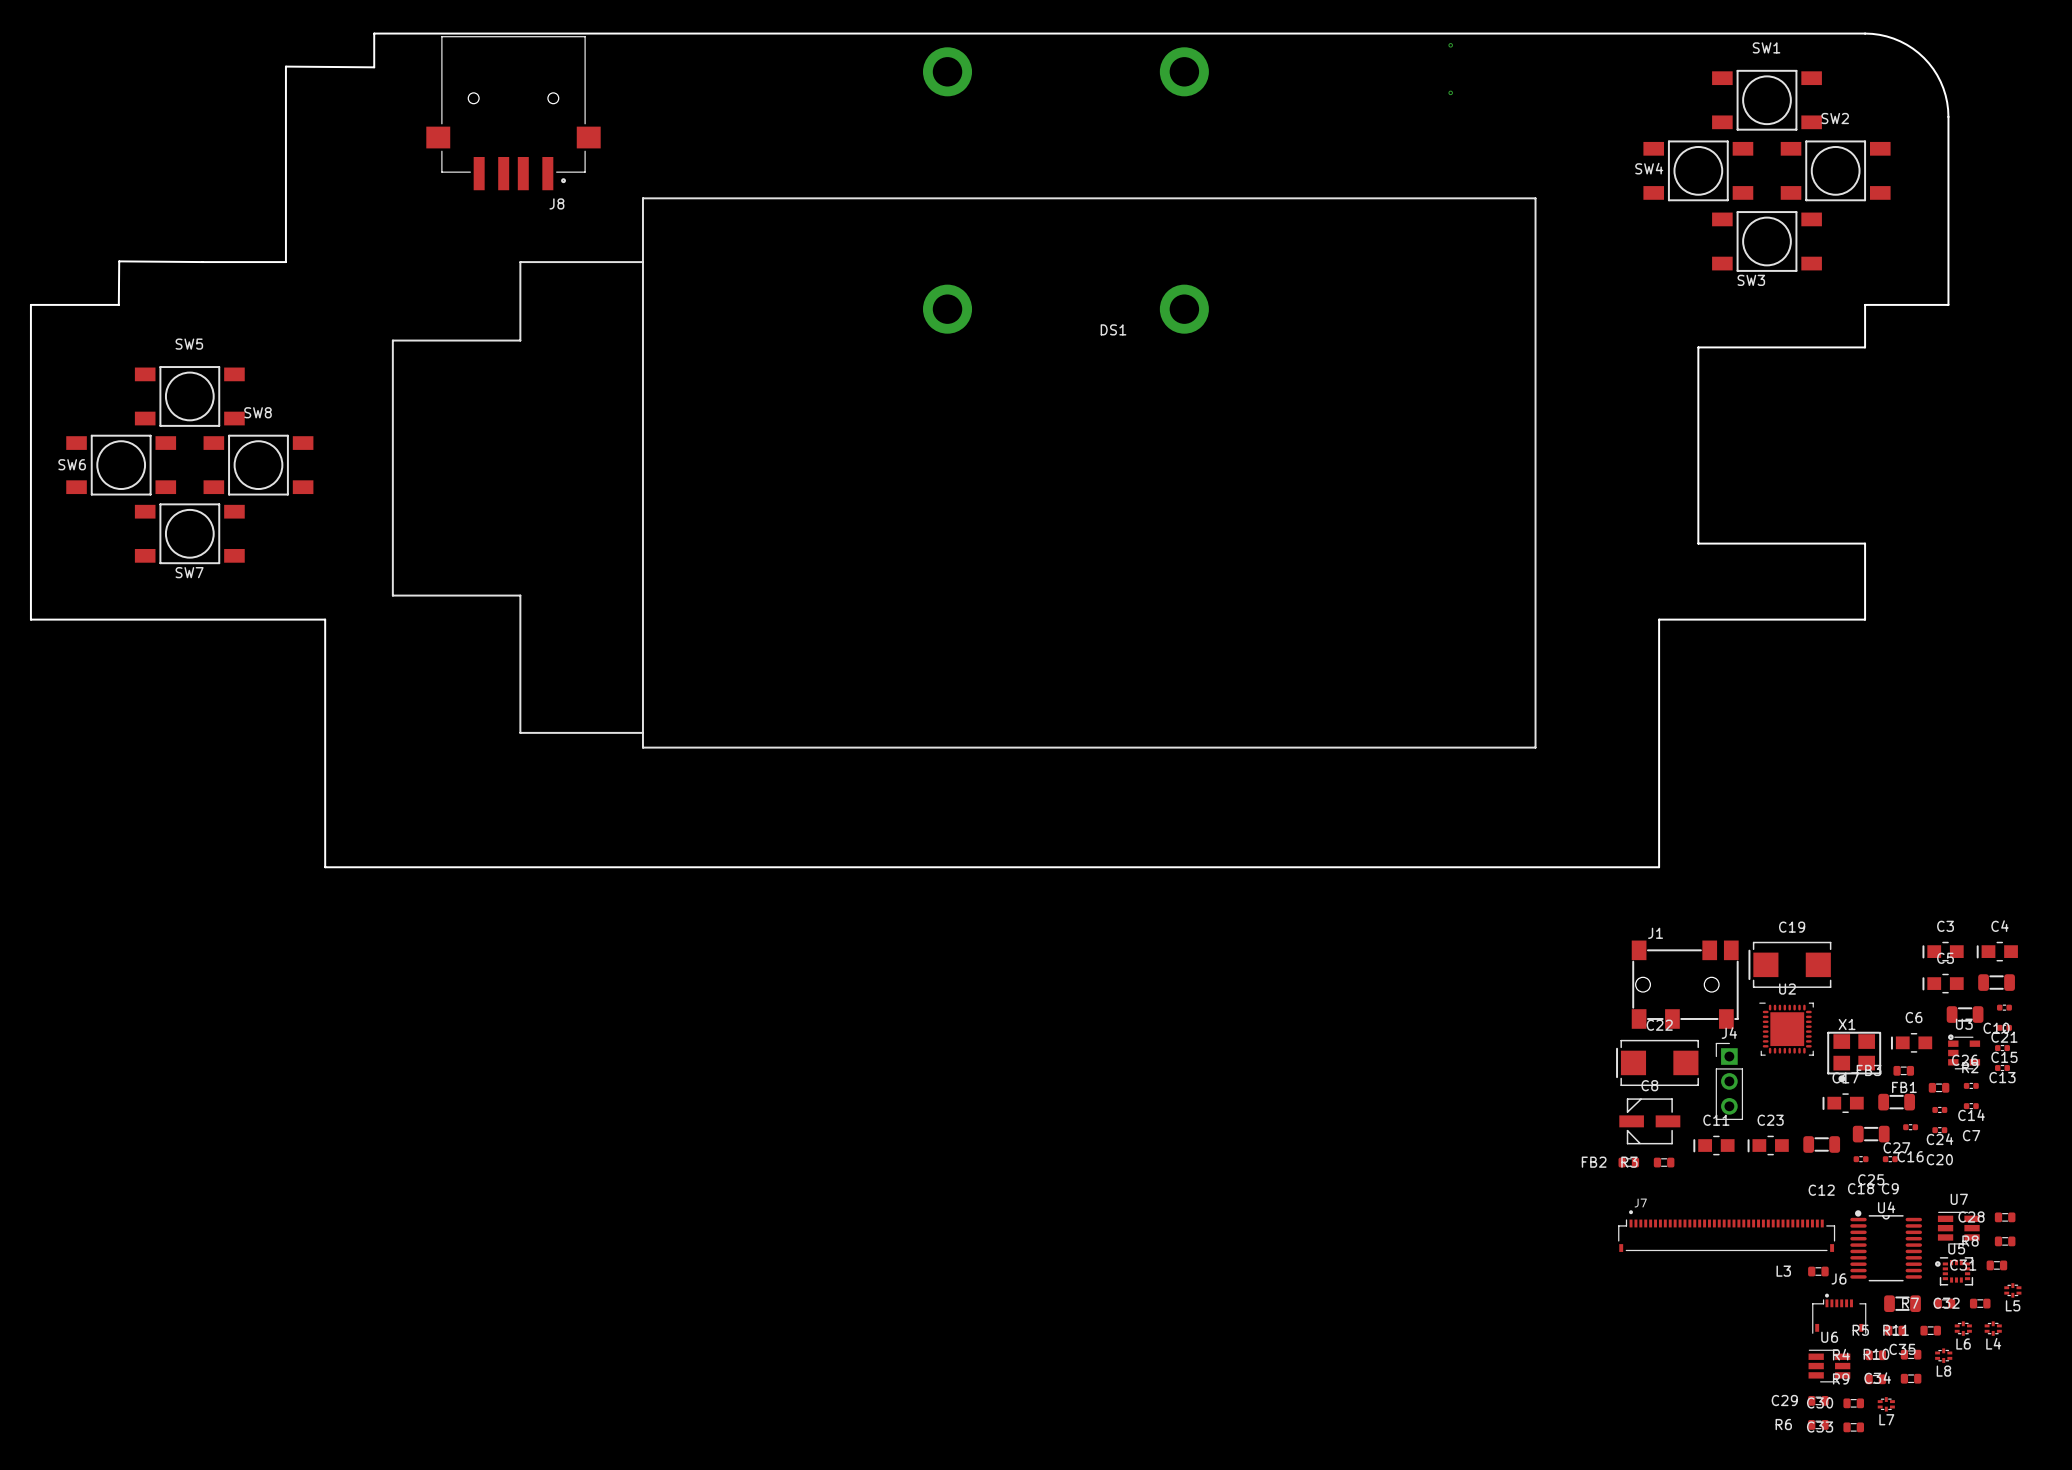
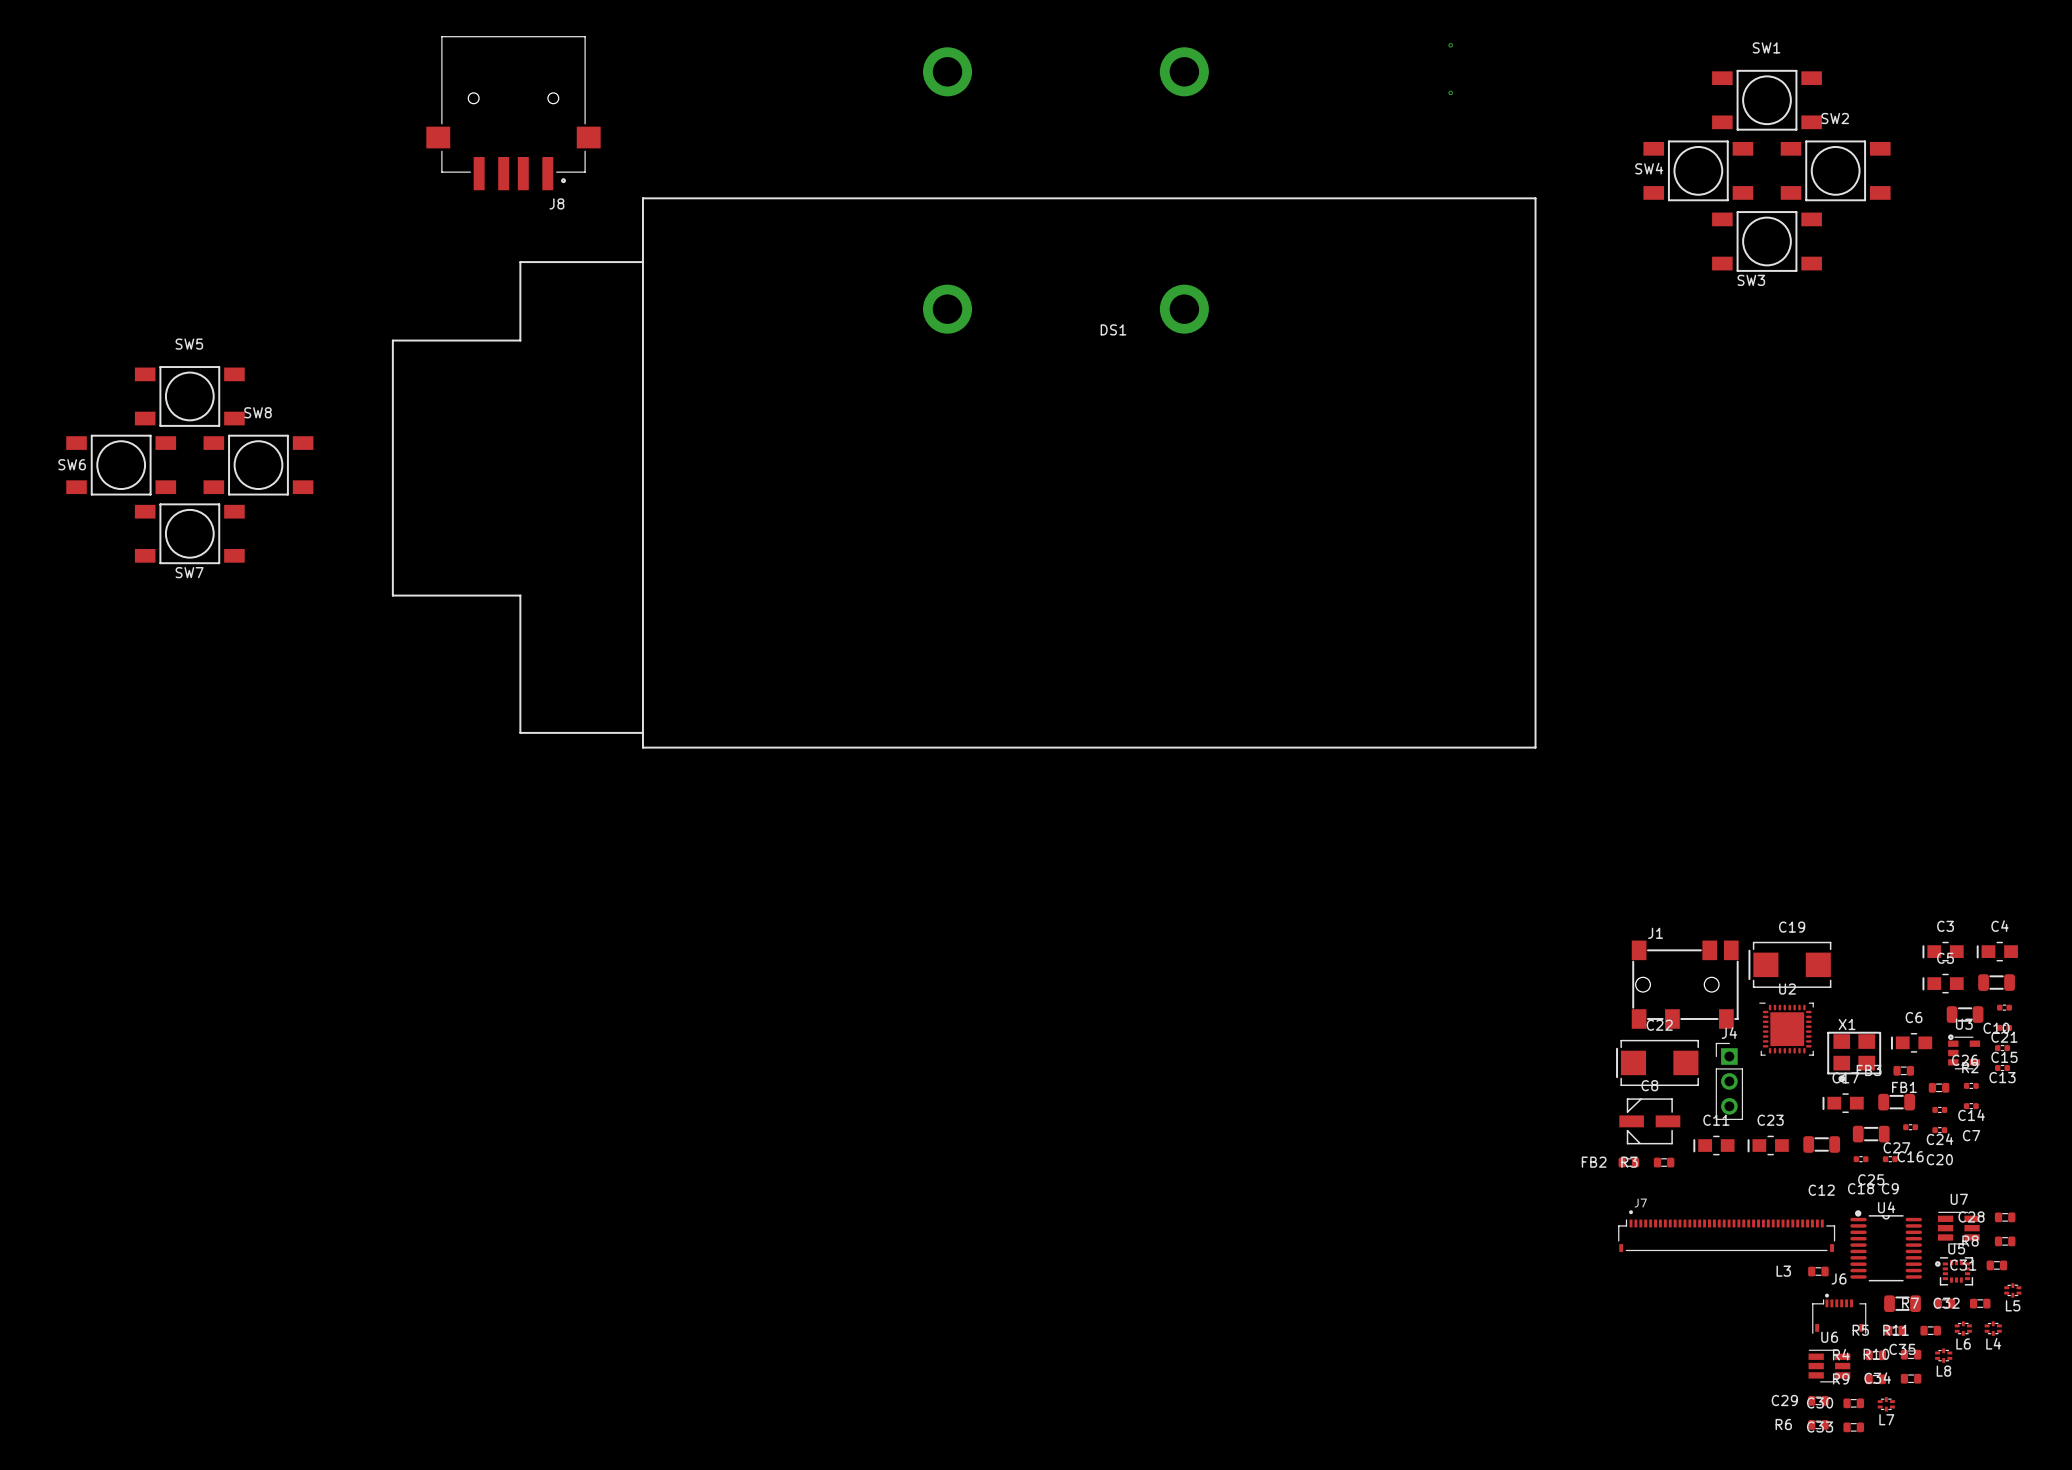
board edge: (374, 33) (374, 67) (285, 66) (285, 262) (119, 261) (118, 304) (30, 304) (30, 619) (325, 619) (325, 867) (1659, 867) (1659, 619) (1865, 619) (1865, 543) (1698, 543) (1698, 347) (1865, 347) (1865, 304) (1948, 304) (1947, 102) (1940, 81) (1928, 63) (1912, 48) (1893, 38) (1865, 33) (374, 33) -> none

